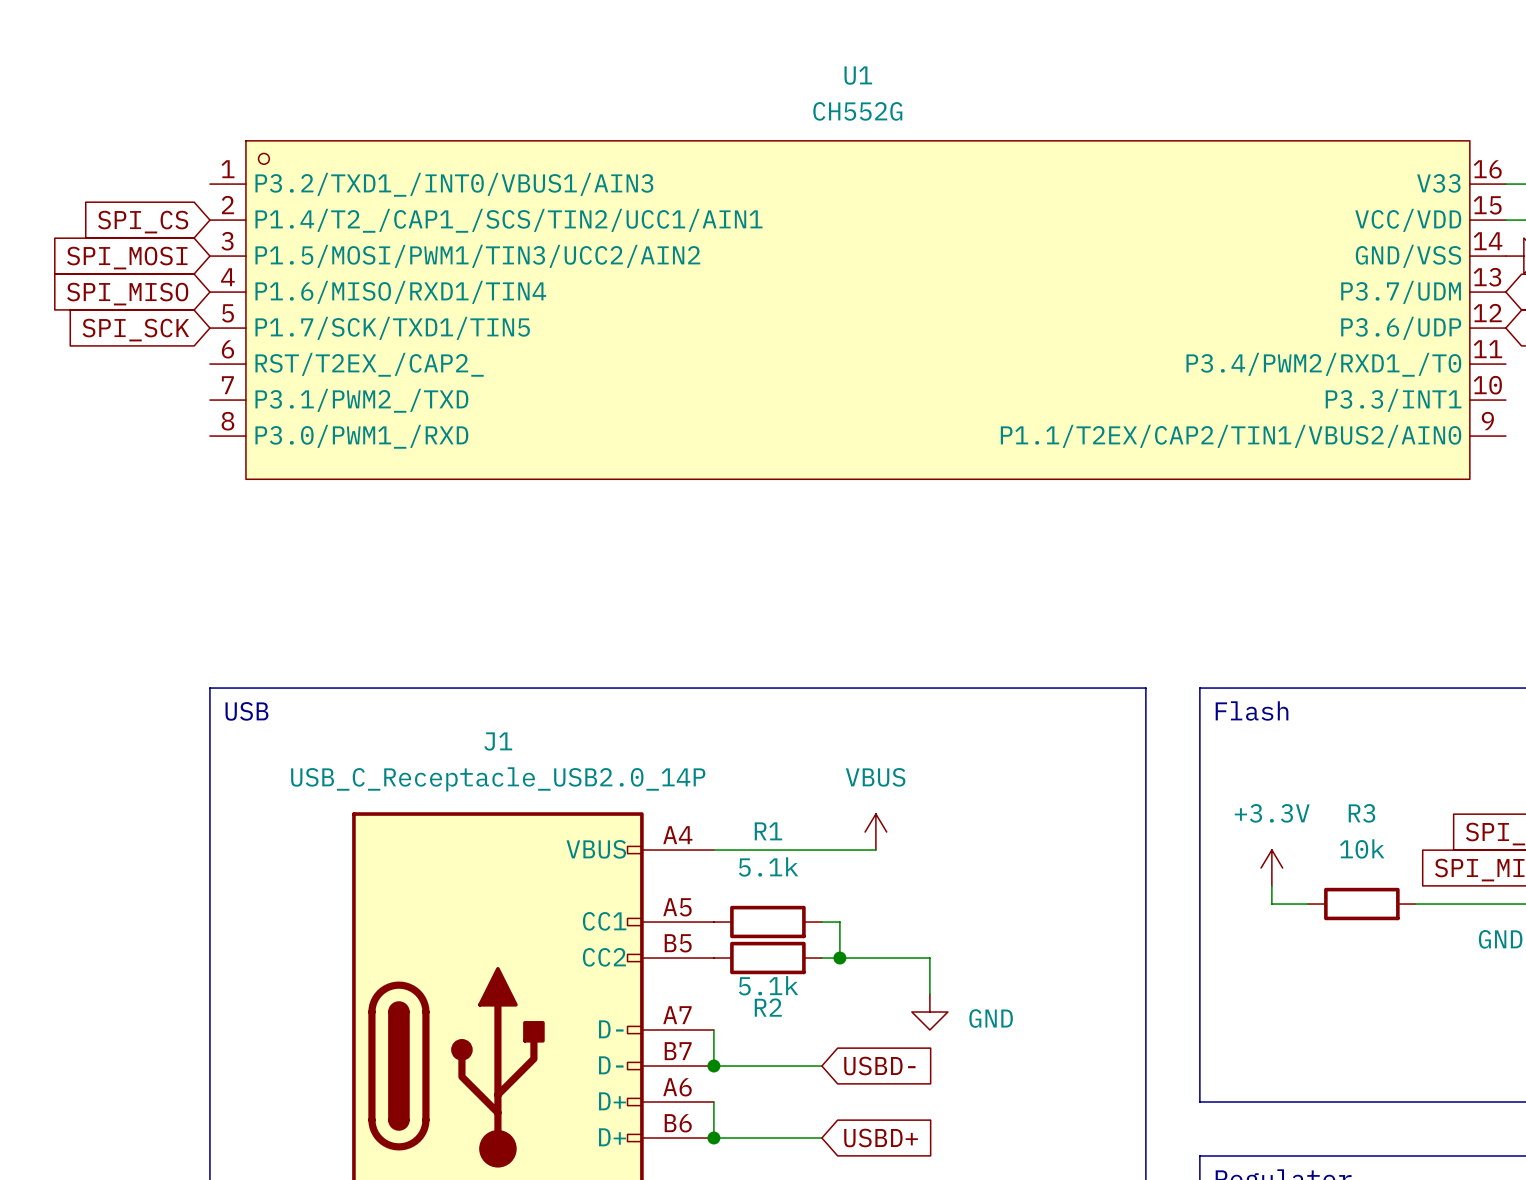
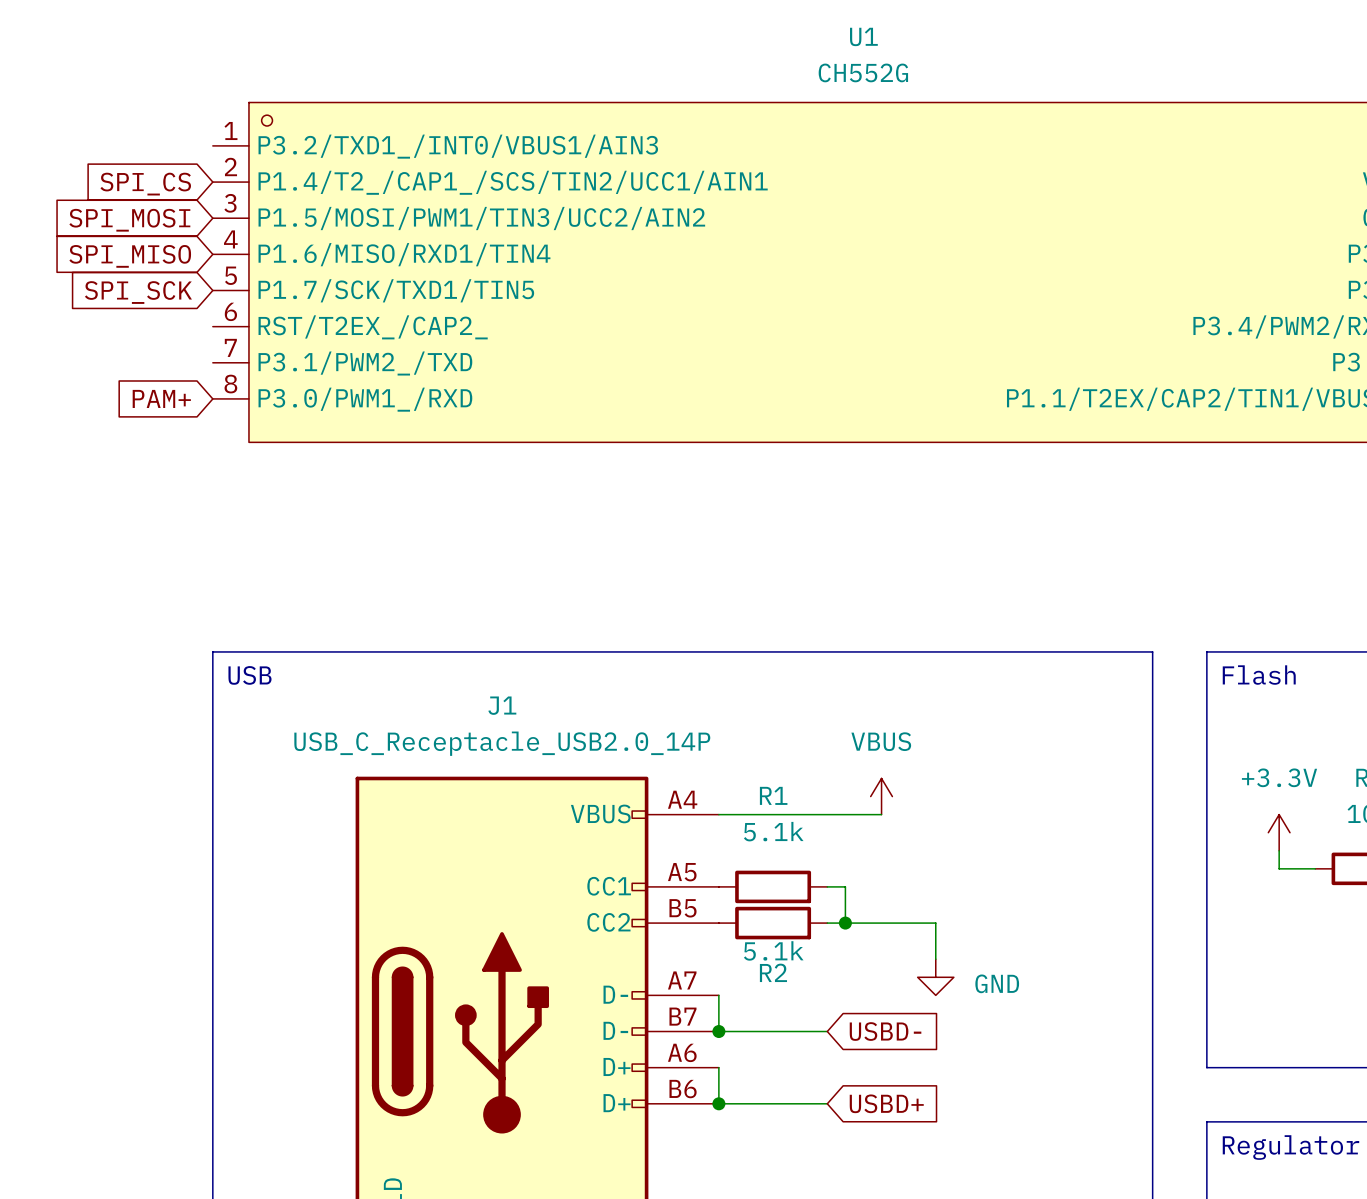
global label: none -> PAM+ (161, 398)

